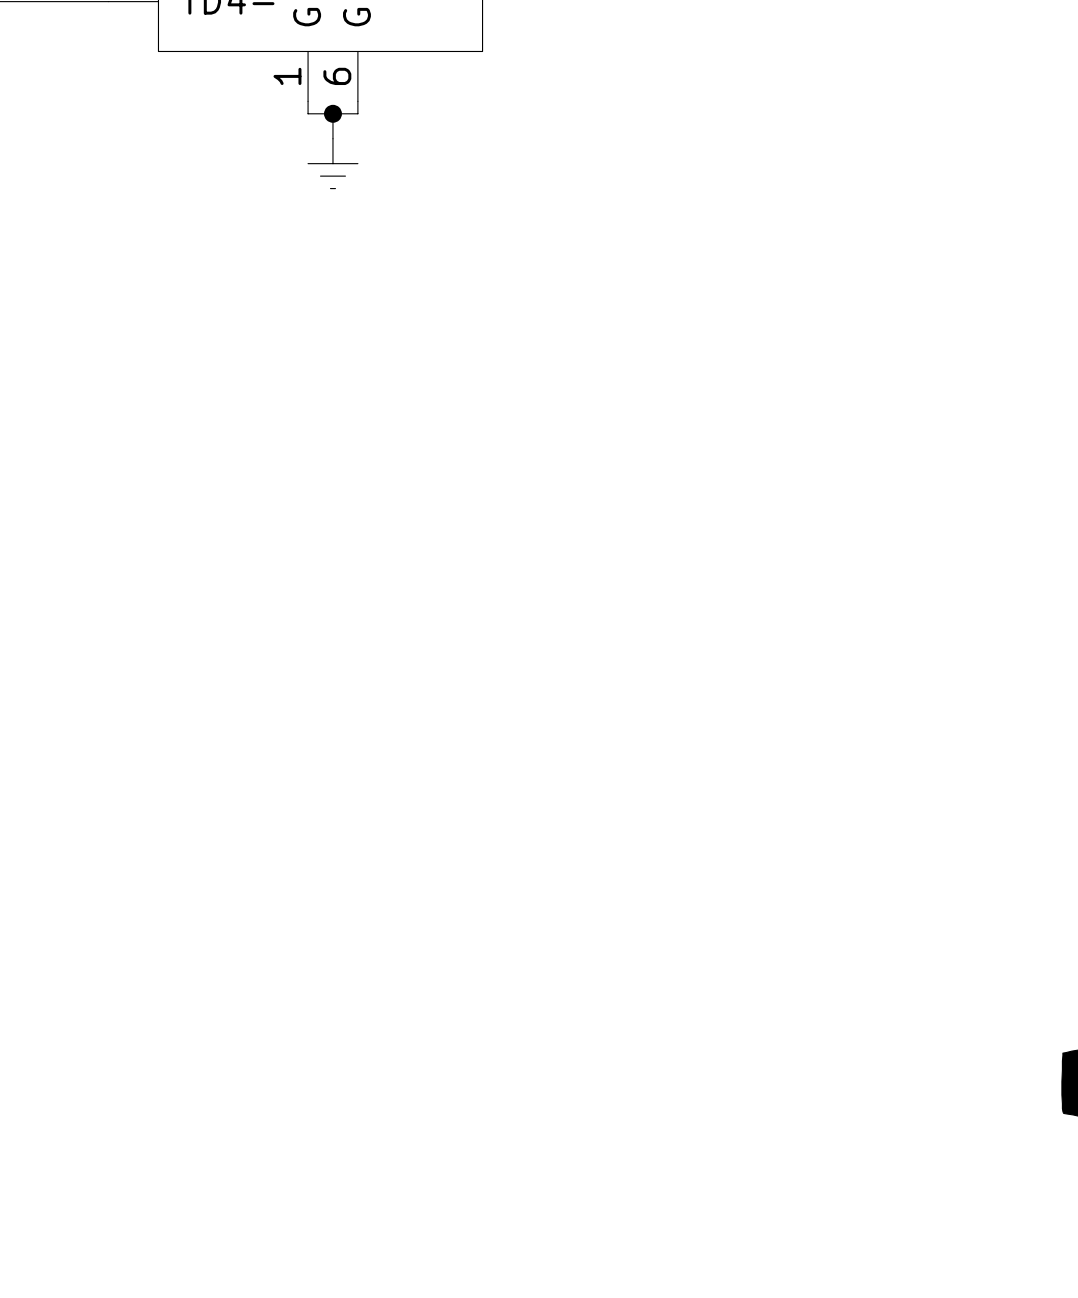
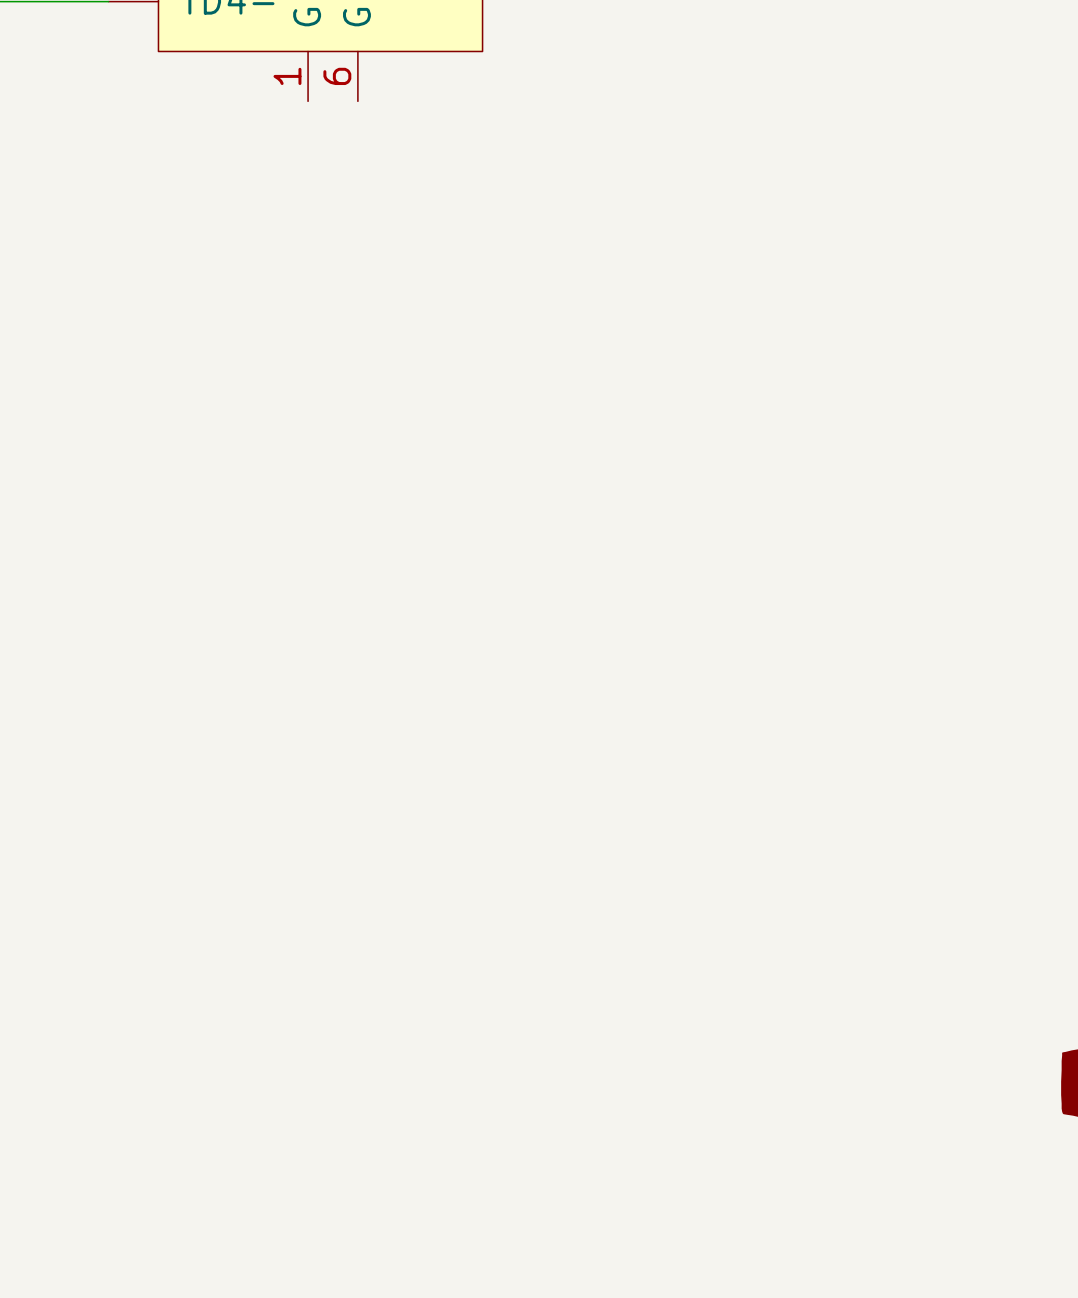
wire: (308, 101) (308, 113) (357, 113) (357, 101) -> none
wire: (332, 113) (332, 138) -> none
junction: (332, 113) -> none
power symbol: (332, 163) -> none

